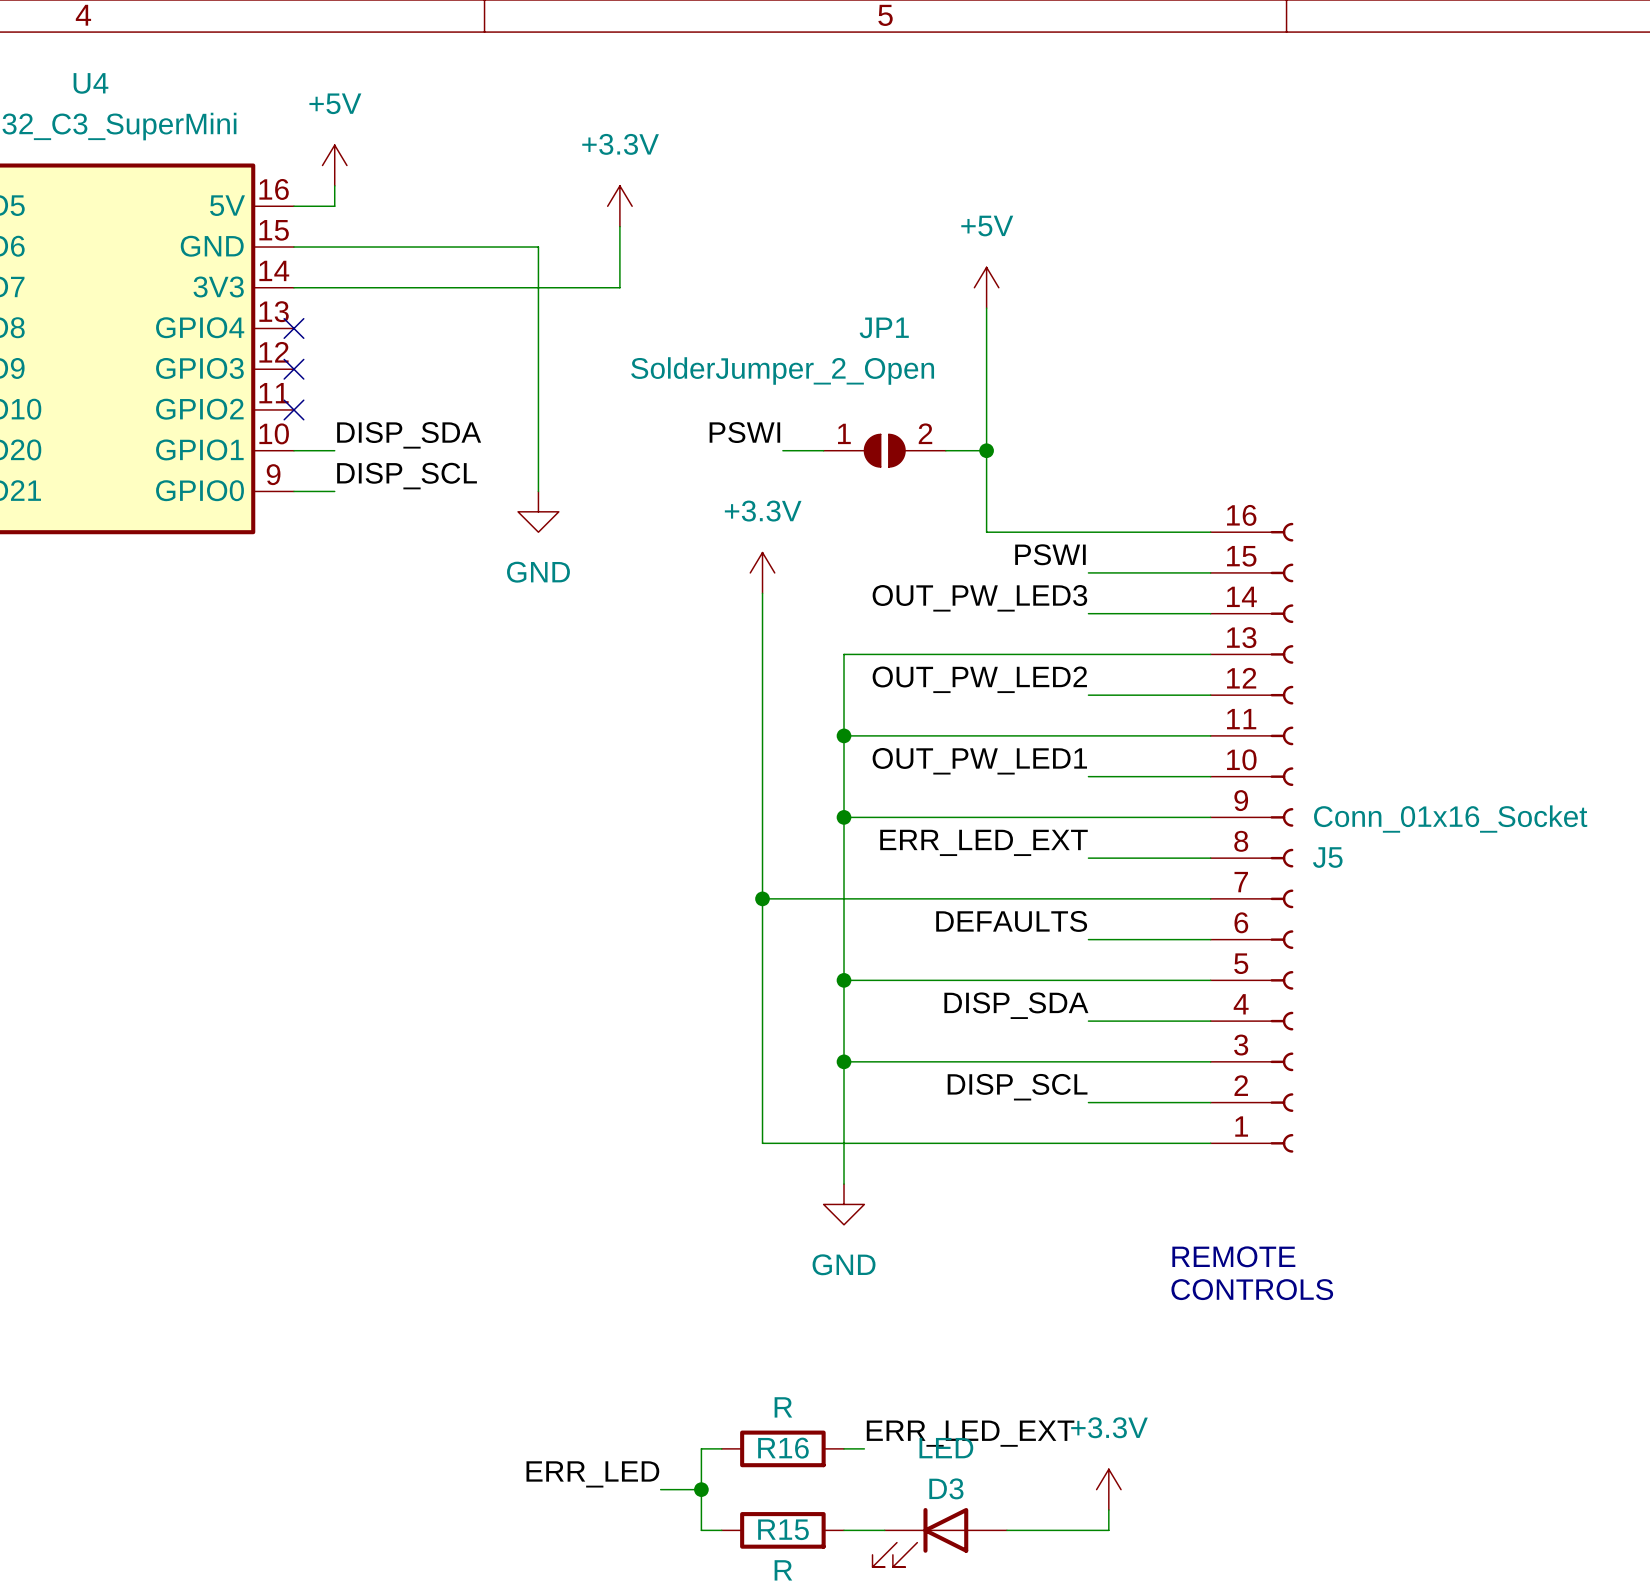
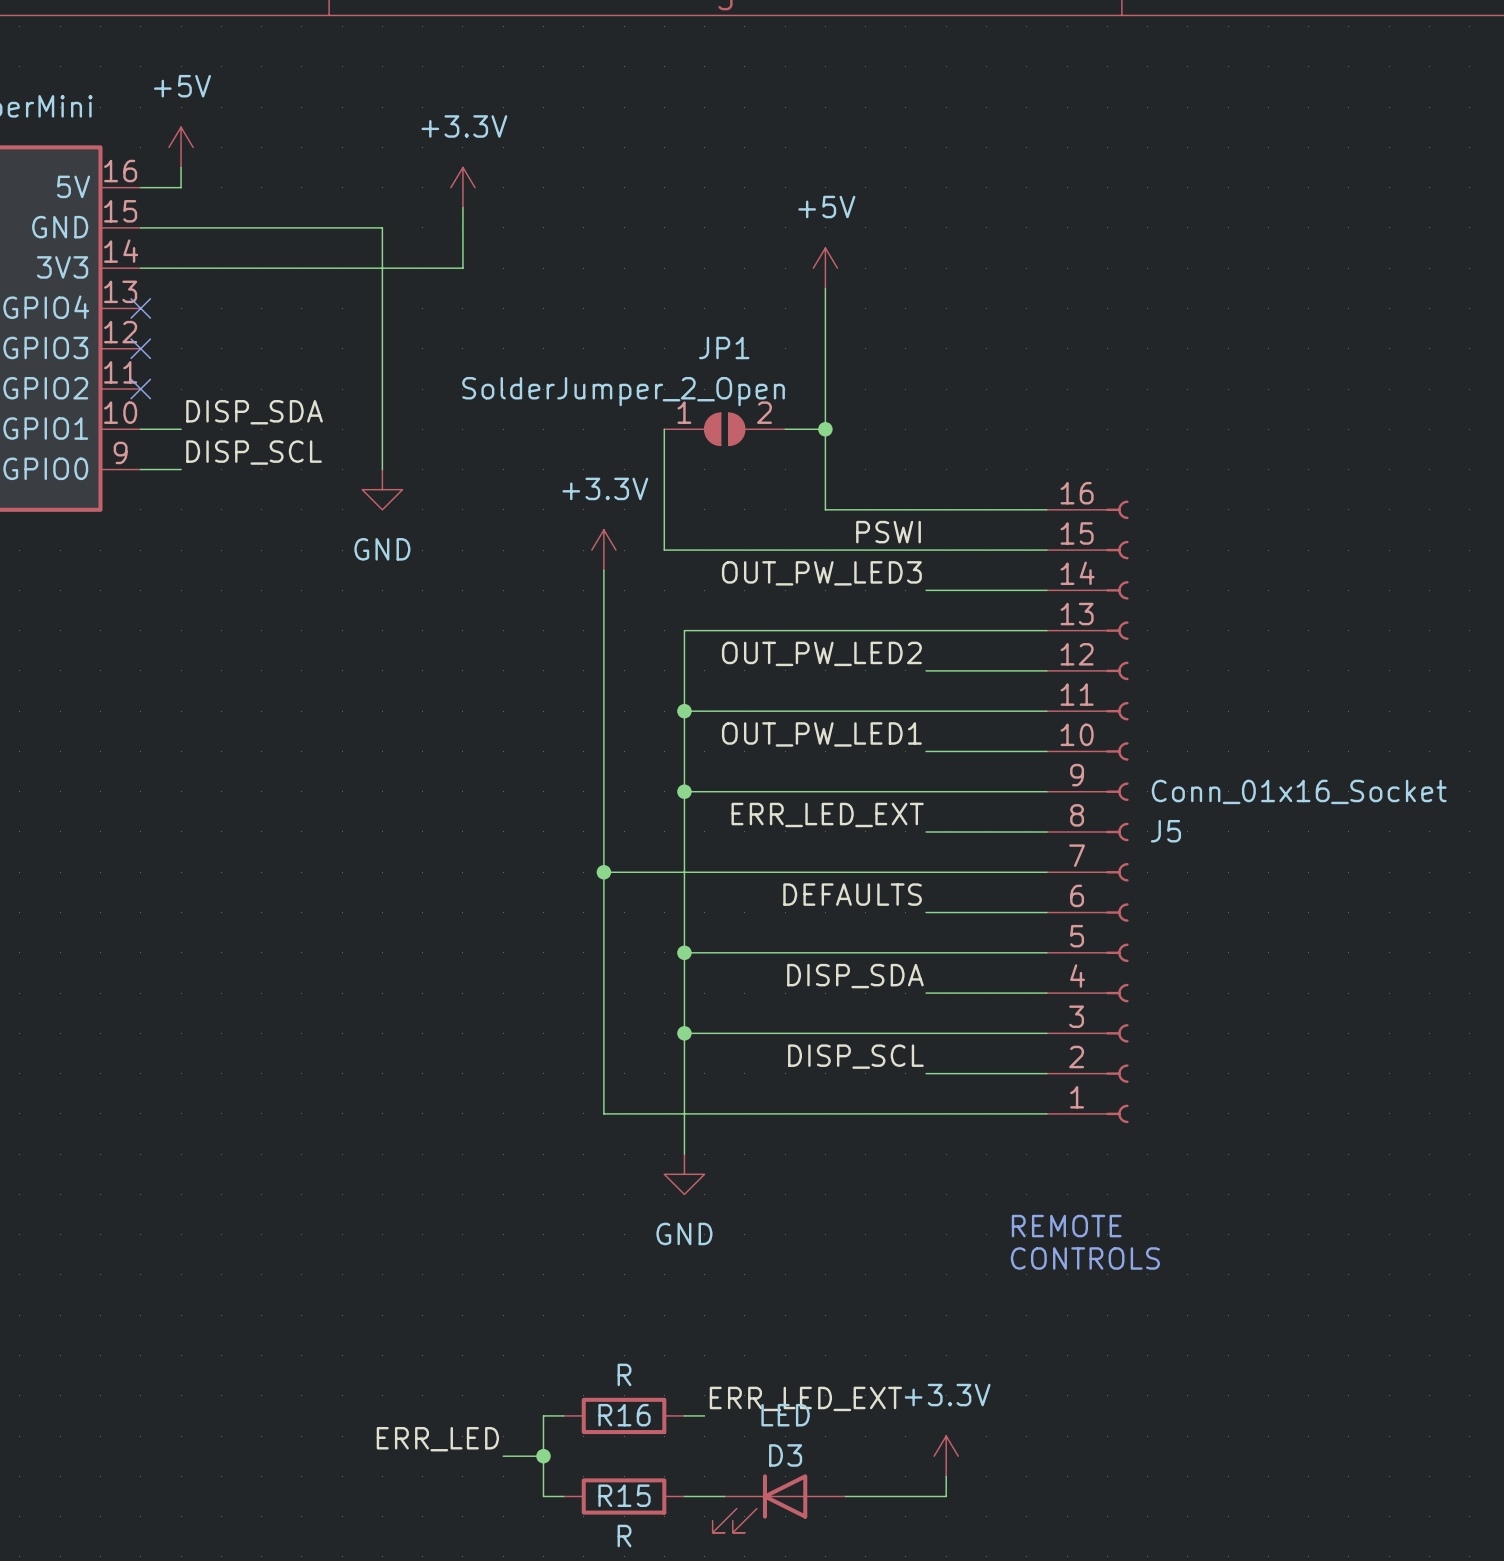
JP1 name position: JP1 (884, 327) -> JP1 (724, 347)
JP1 value position: SolderJumper_2_Open (782, 371) -> SolderJumper_2_Open (623, 391)
label: PSWI (744, 432) -> none
wire: (782, 450) (823, 450) -> (926, 550) (664, 550) (664, 429)

